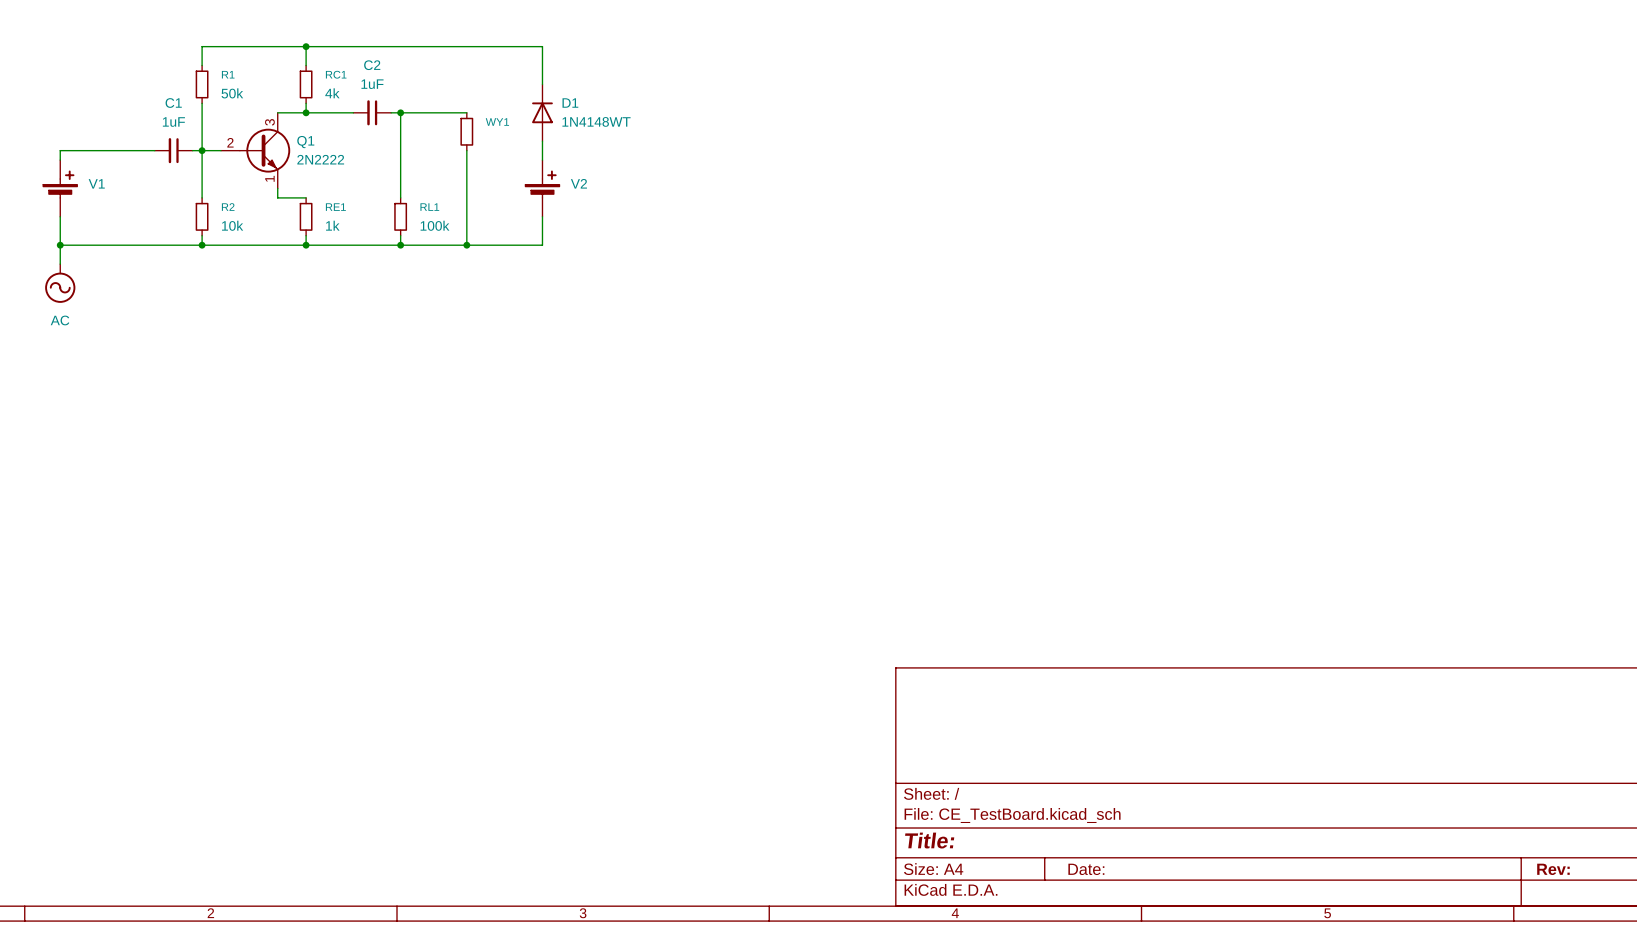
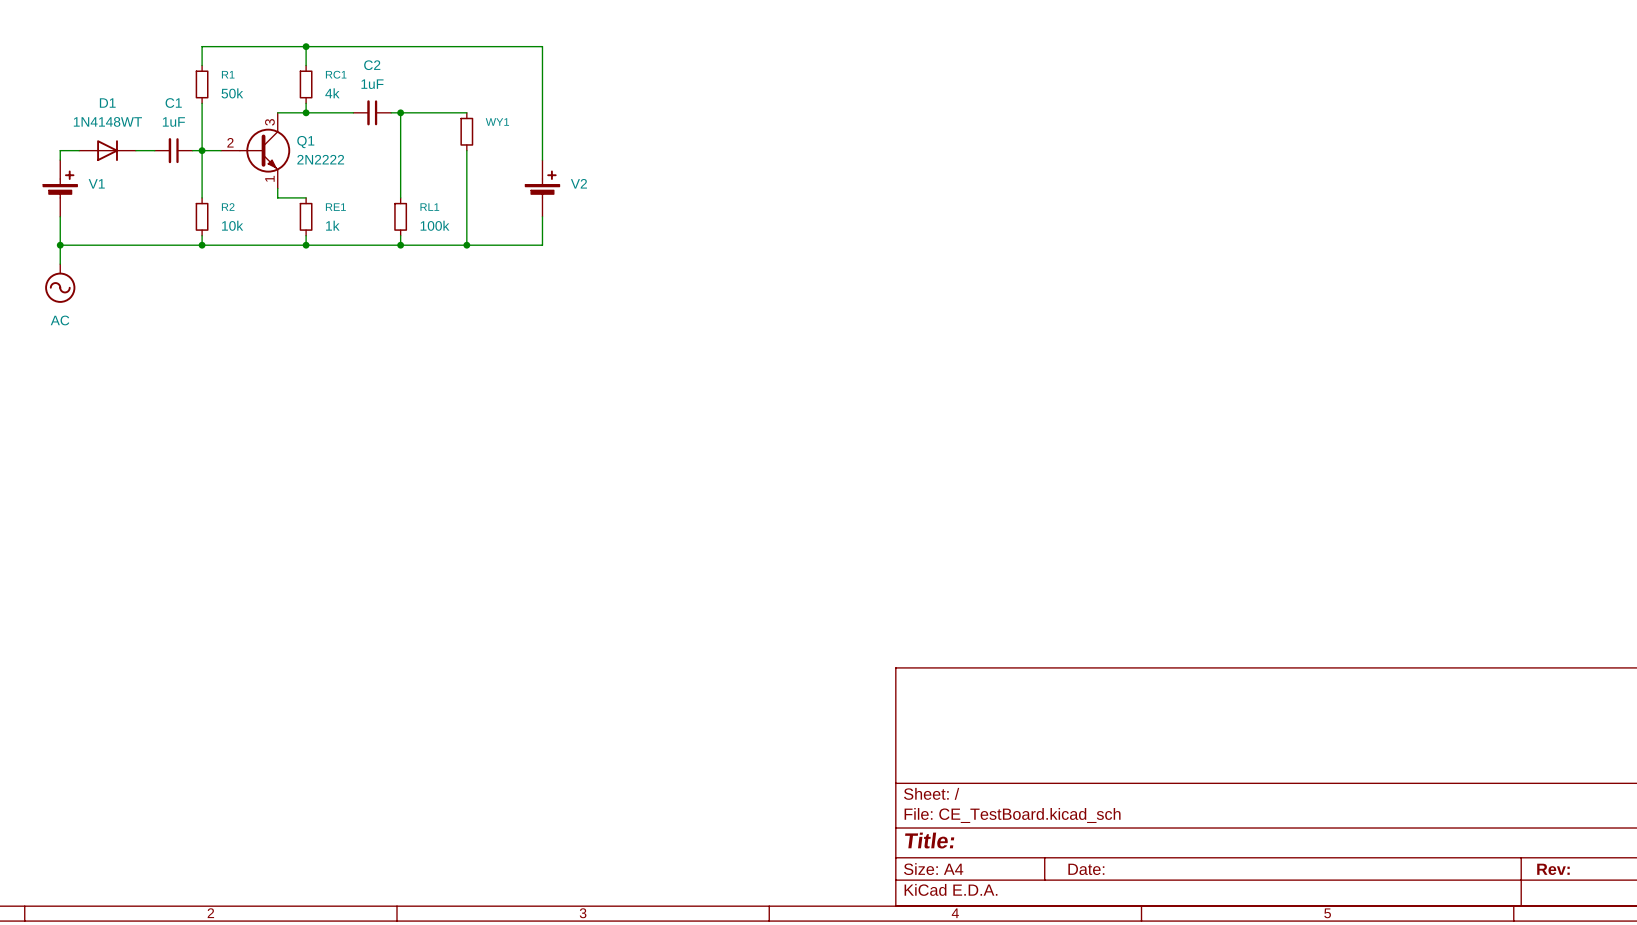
D1 name position: D1 (570, 103) -> D1 (107, 103)
D1 rotation: 0° (542, 112) -> 90° clockwise (107, 150)
D1 position: (542, 112) -> (107, 150)
D1 value position: 1N4148WT (596, 121) -> 1N4148WT (107, 121)

